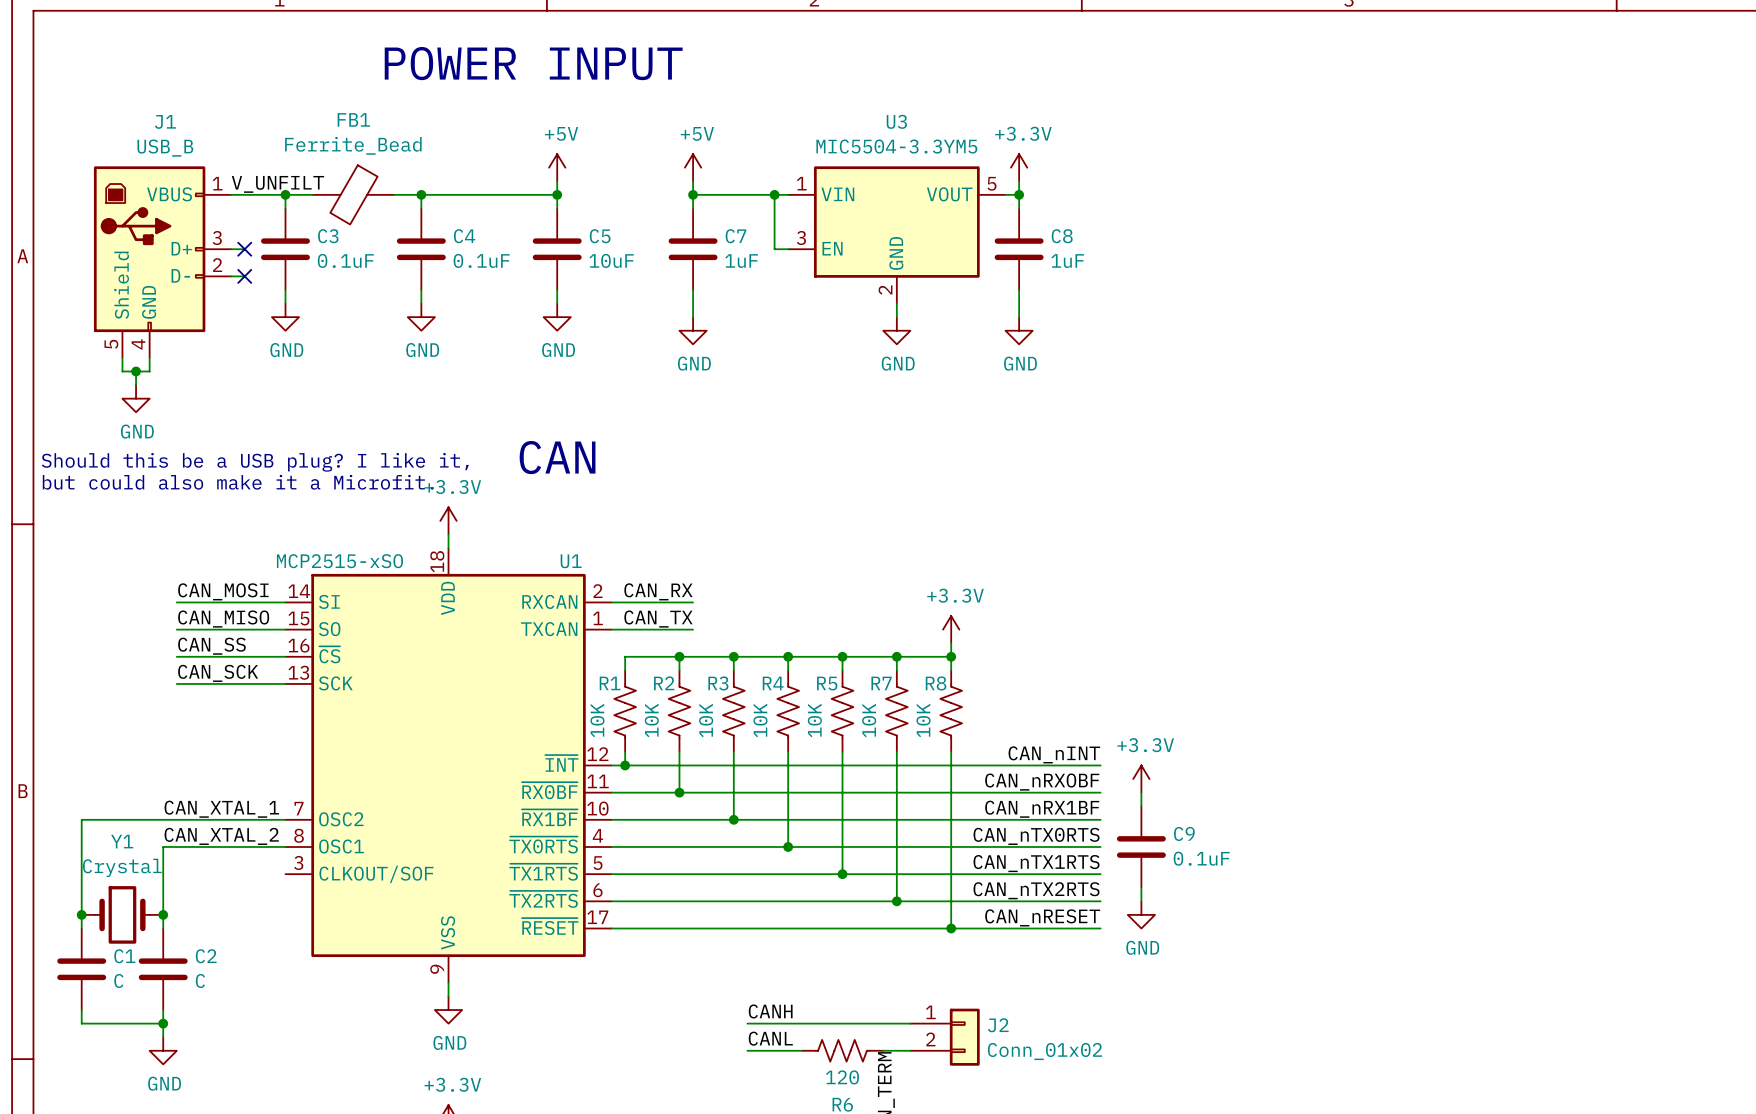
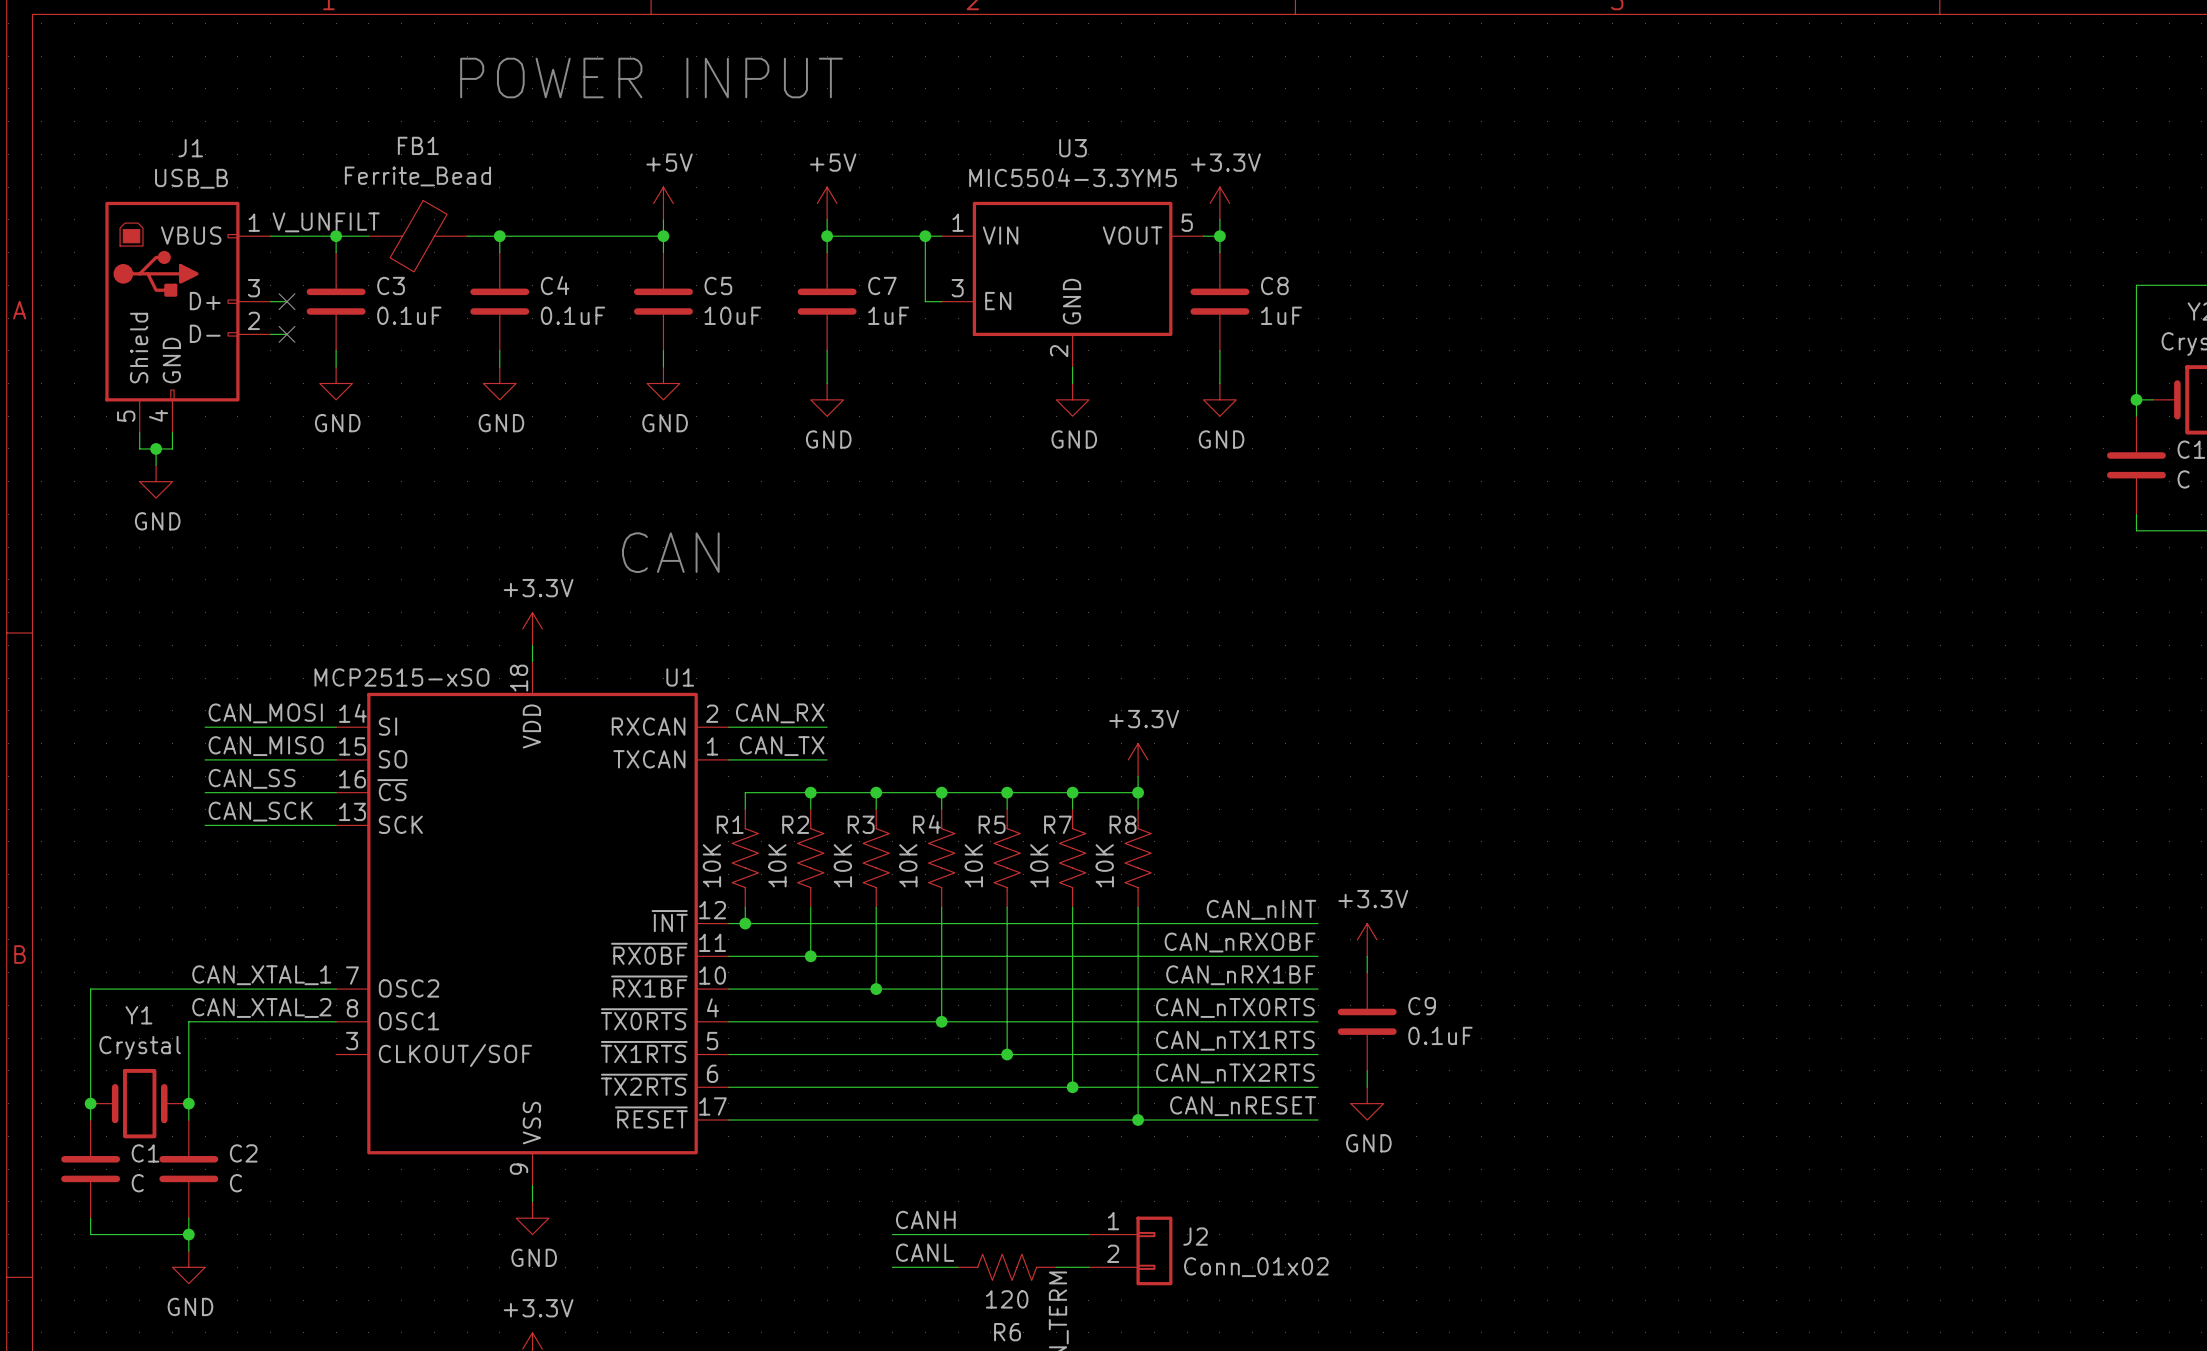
text: Should this be a USB plug? I like it, (255, 462) -> none
text: but could also make it a Microfit. (238, 482) -> none

